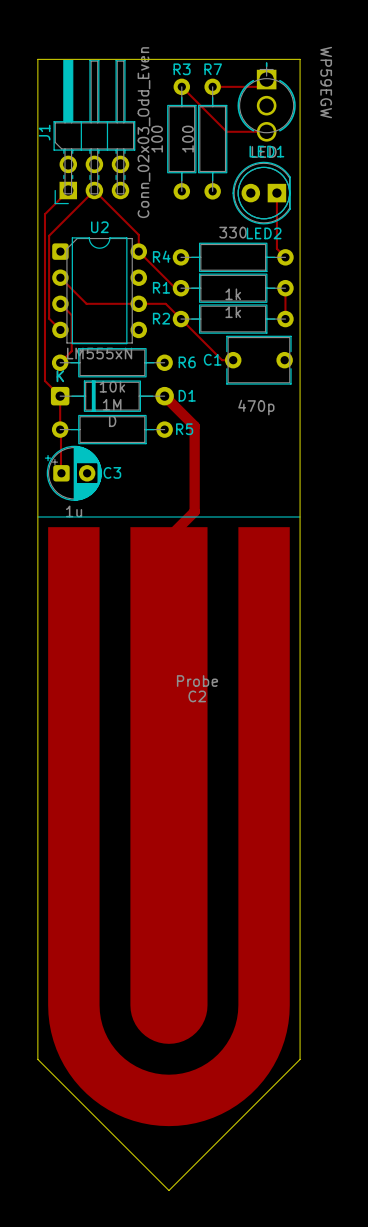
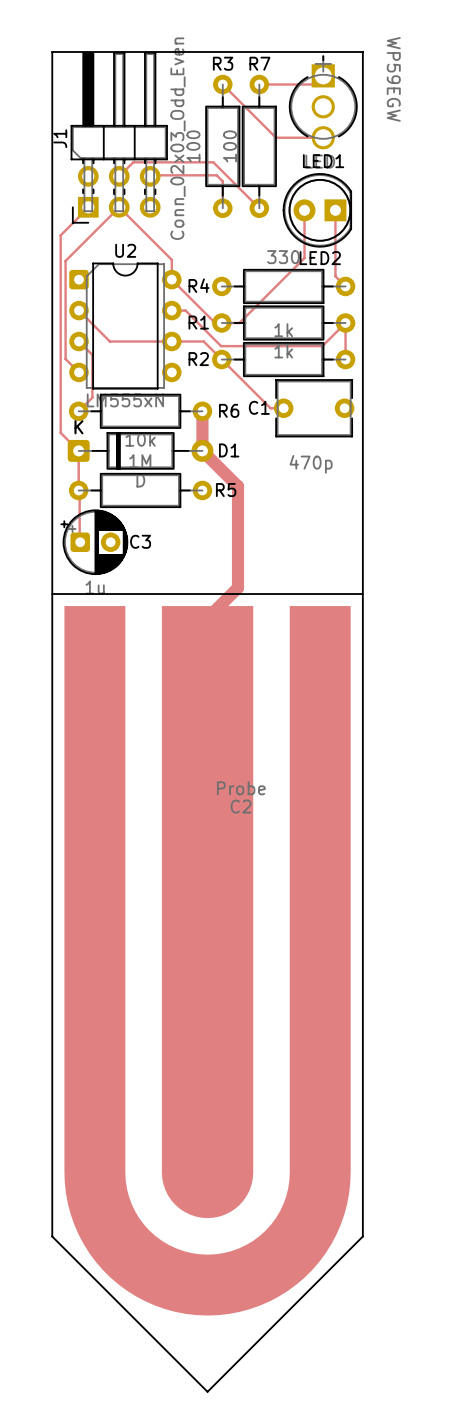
track: none -> (119, 176) (133, 162) (213, 162) (259, 208)
track: none -> (150, 176) (216, 175) (222, 181) (222, 208)
track: none -> (304, 210) (304, 258) (239, 323) (221, 323)
track: none -> (171, 310) (185, 310) (221, 346) (322, 346) (345, 323)
track: none -> (202, 411) (202, 450)

